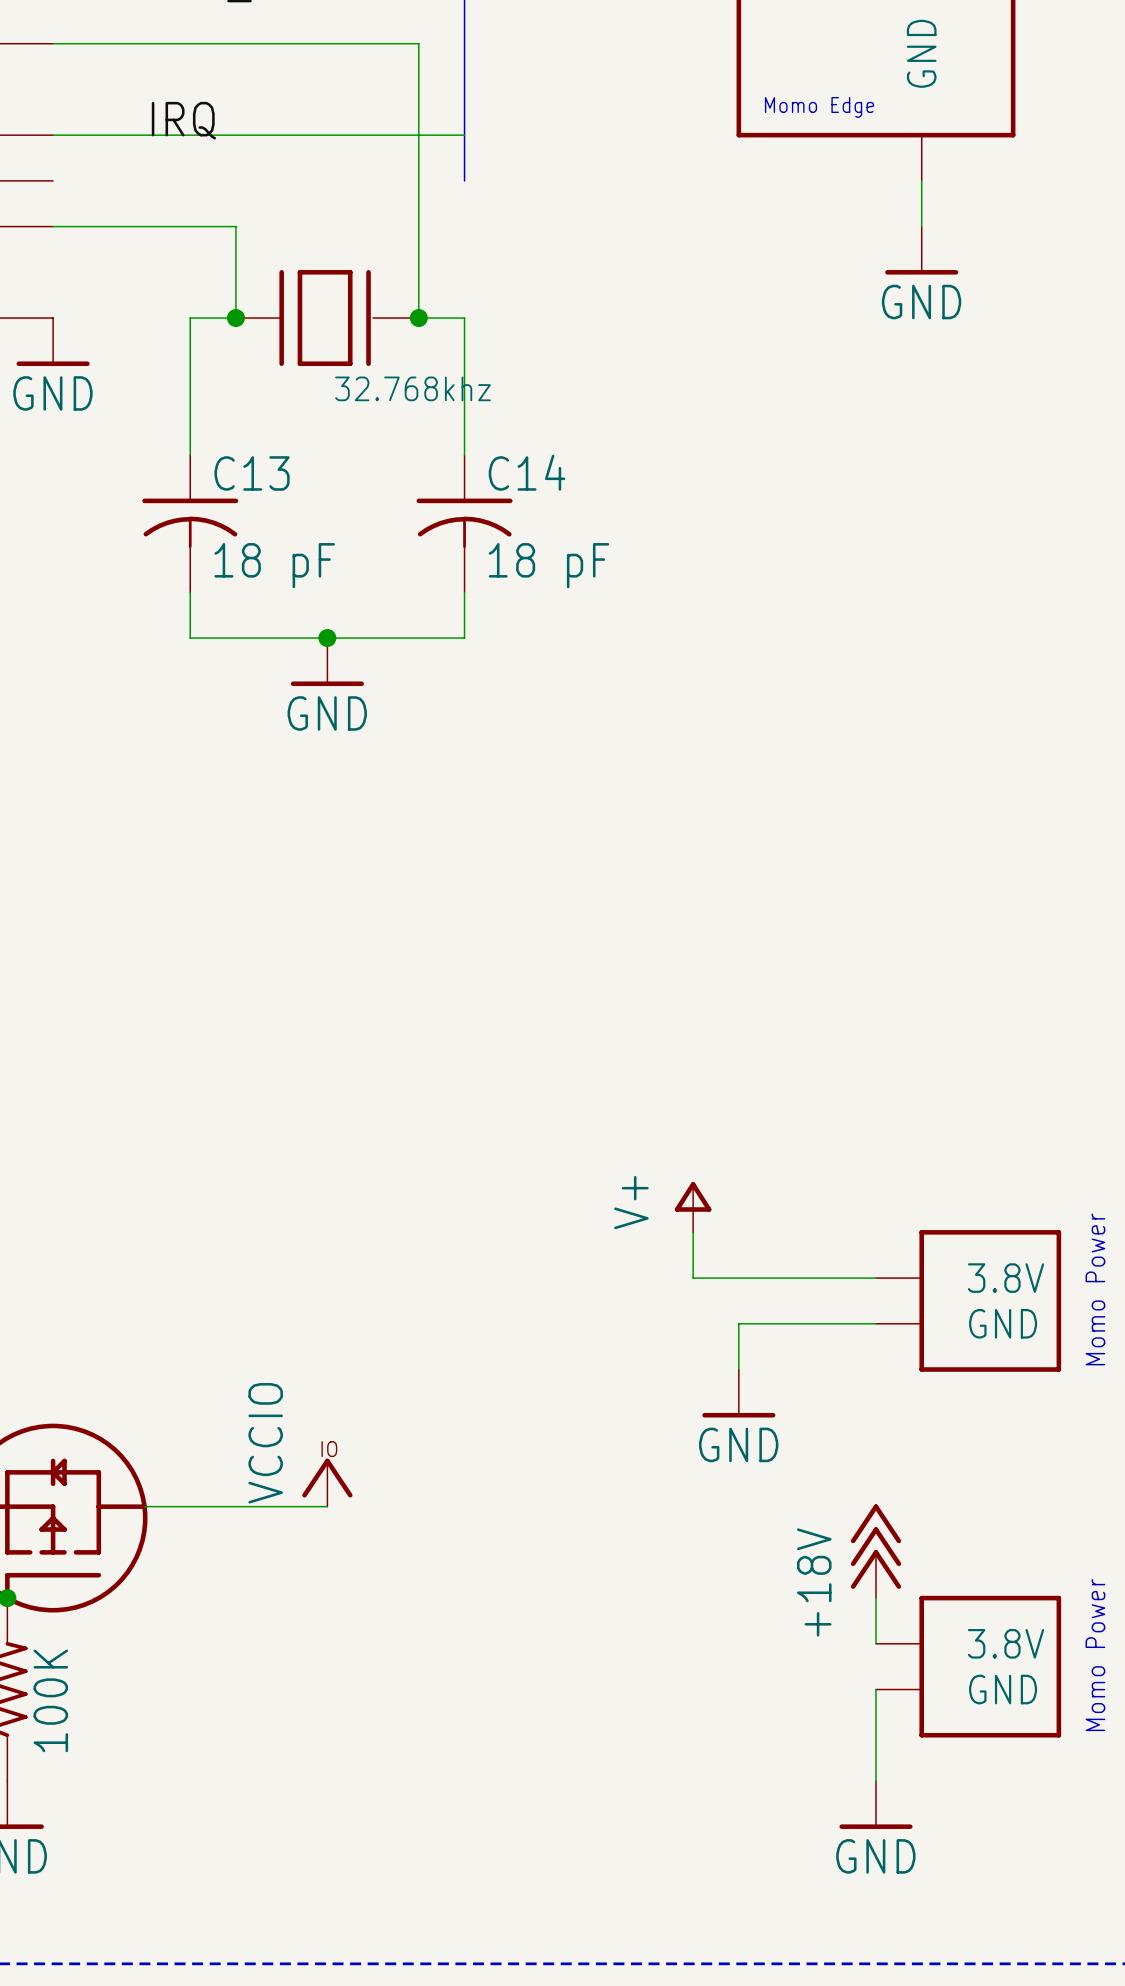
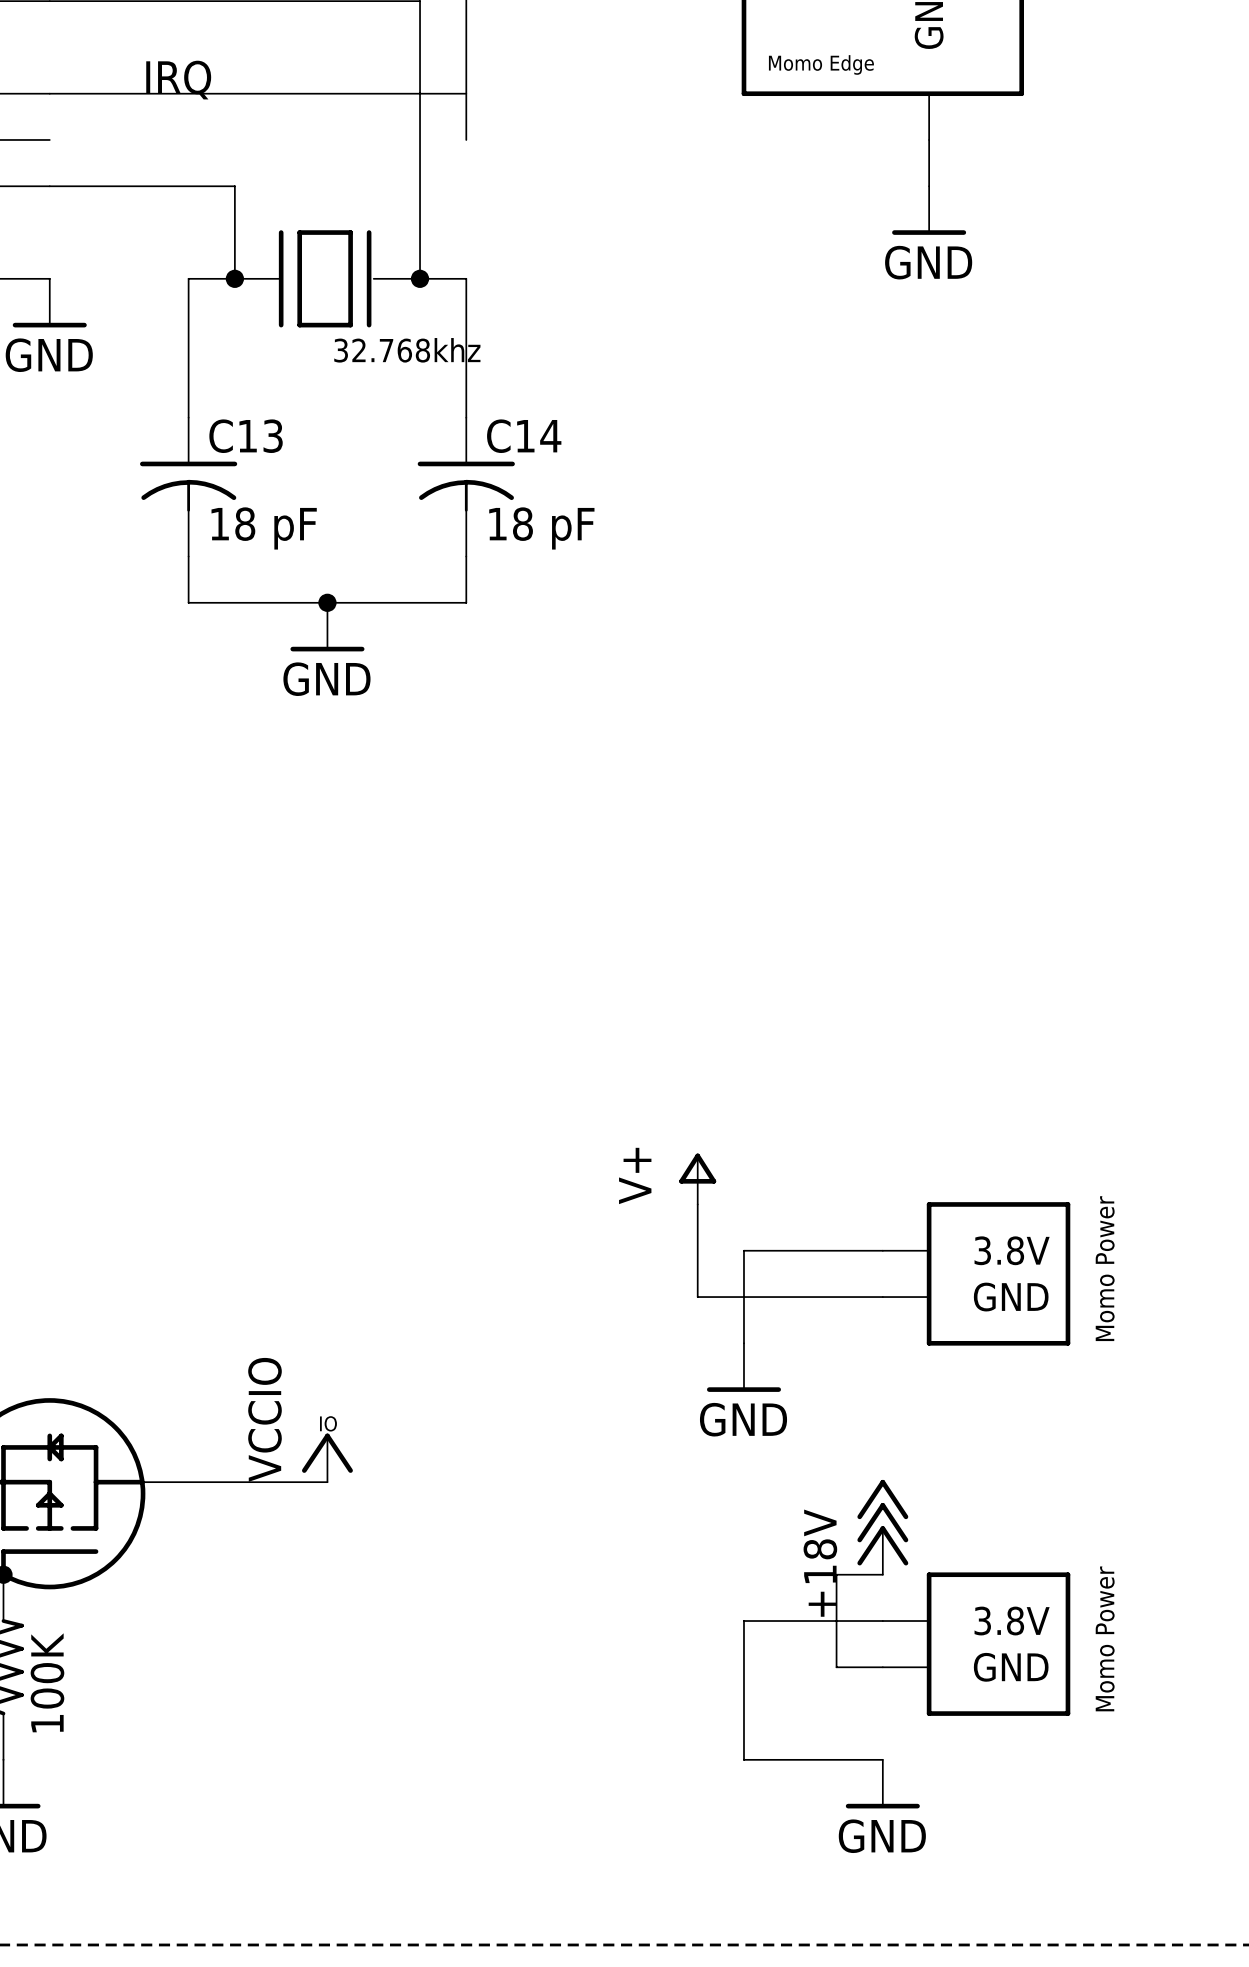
wire: (693, 1278) (738, 1278) -> (697, 1250) (697, 1297) (743, 1297) (743, 1250)
wire: (875, 1598) (875, 1643) -> (882, 1574) (836, 1574) (836, 1667) (882, 1667)
wire: (875, 1689) (875, 1780) -> (882, 1621) (743, 1621) (743, 1759) (882, 1759)

